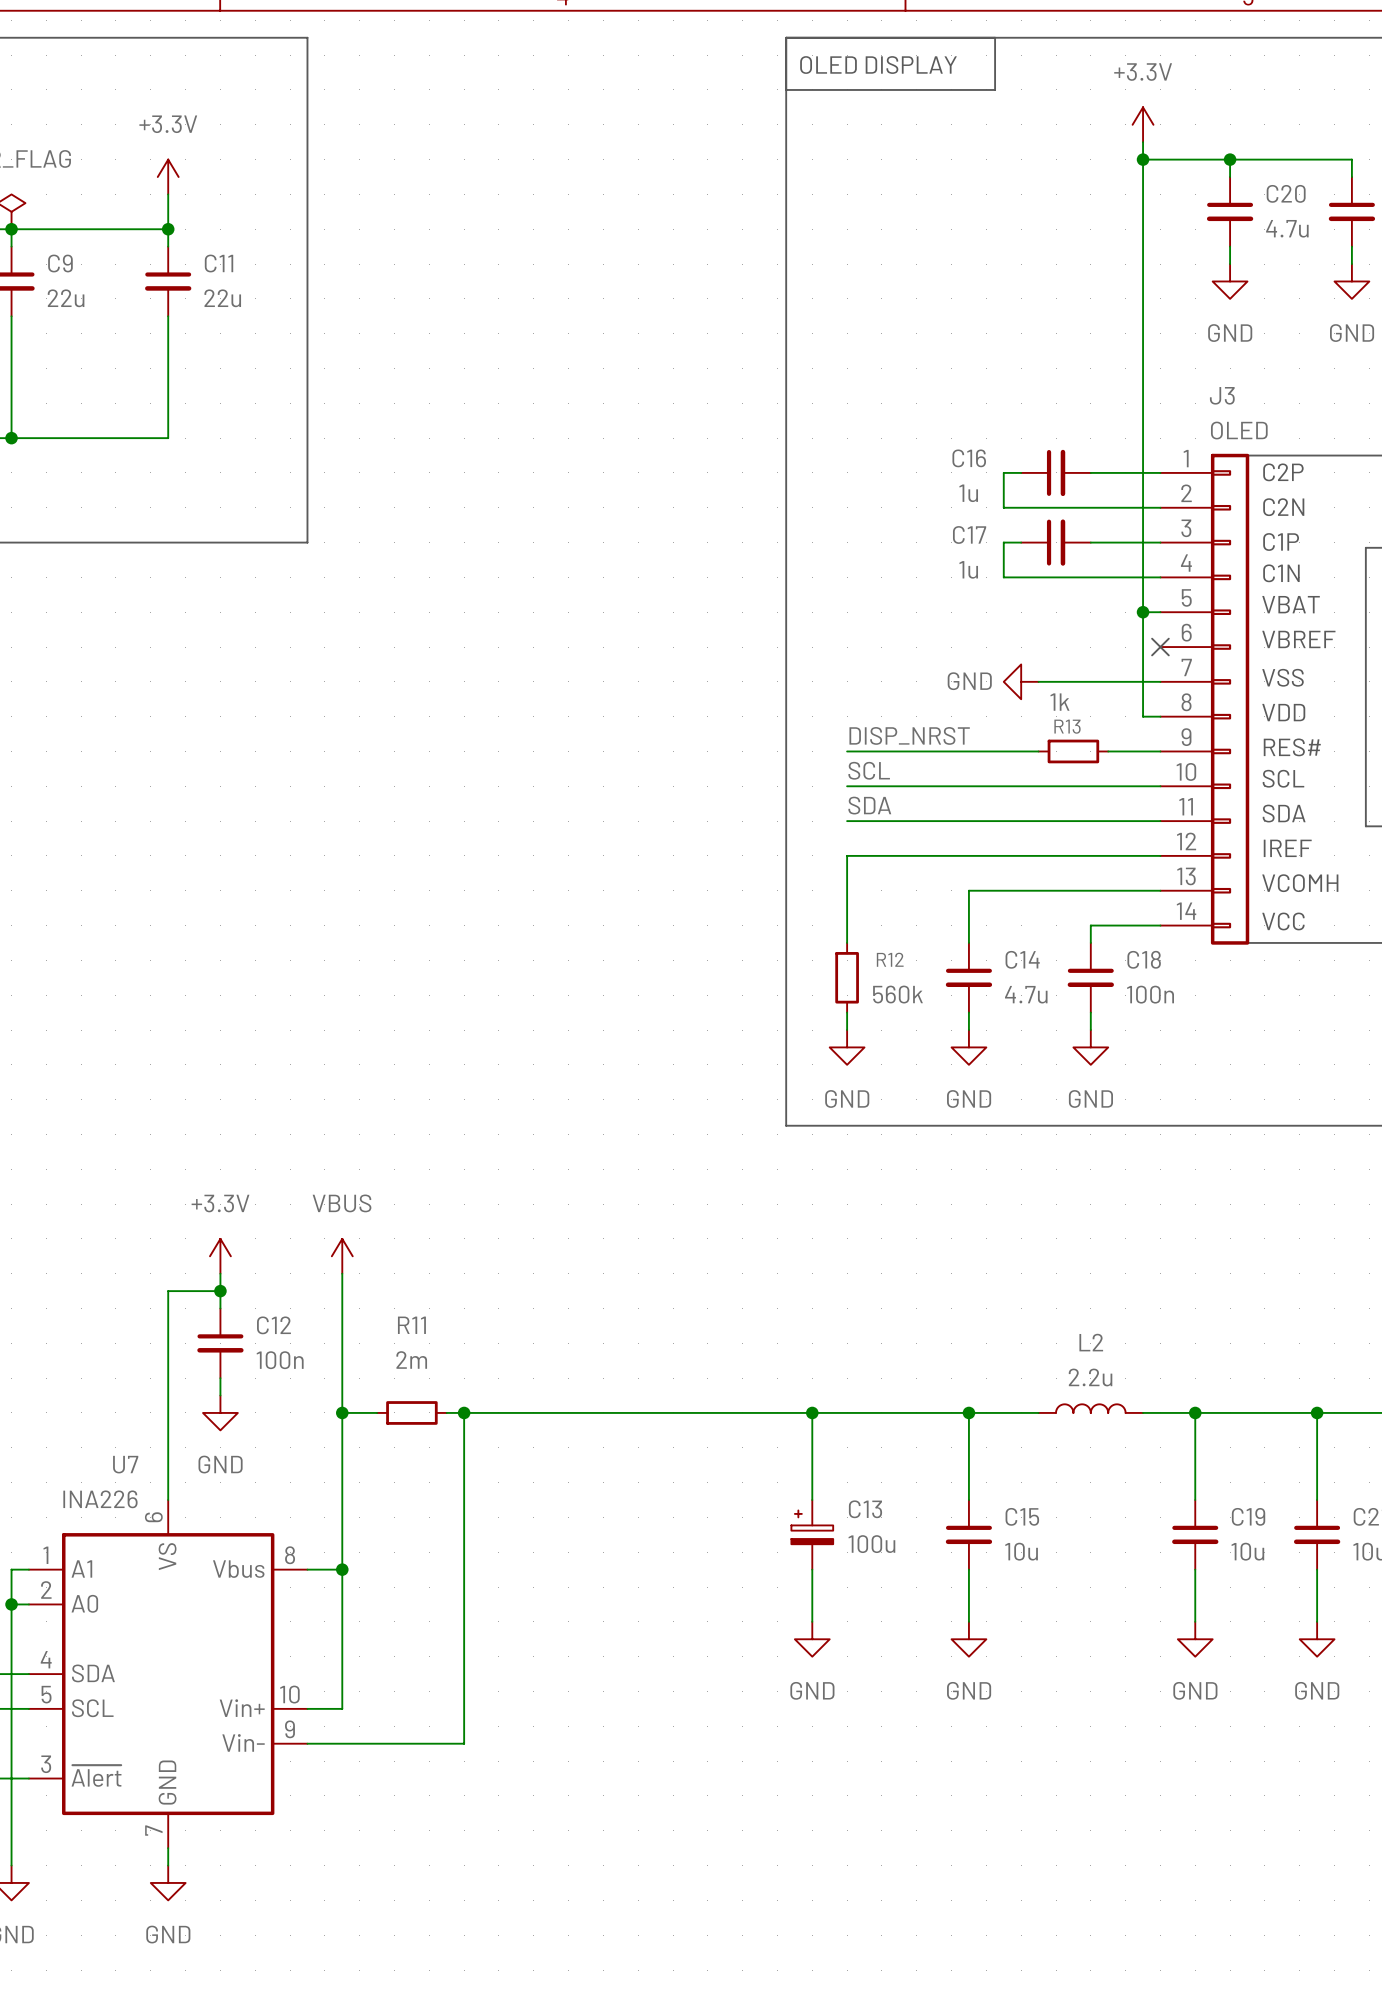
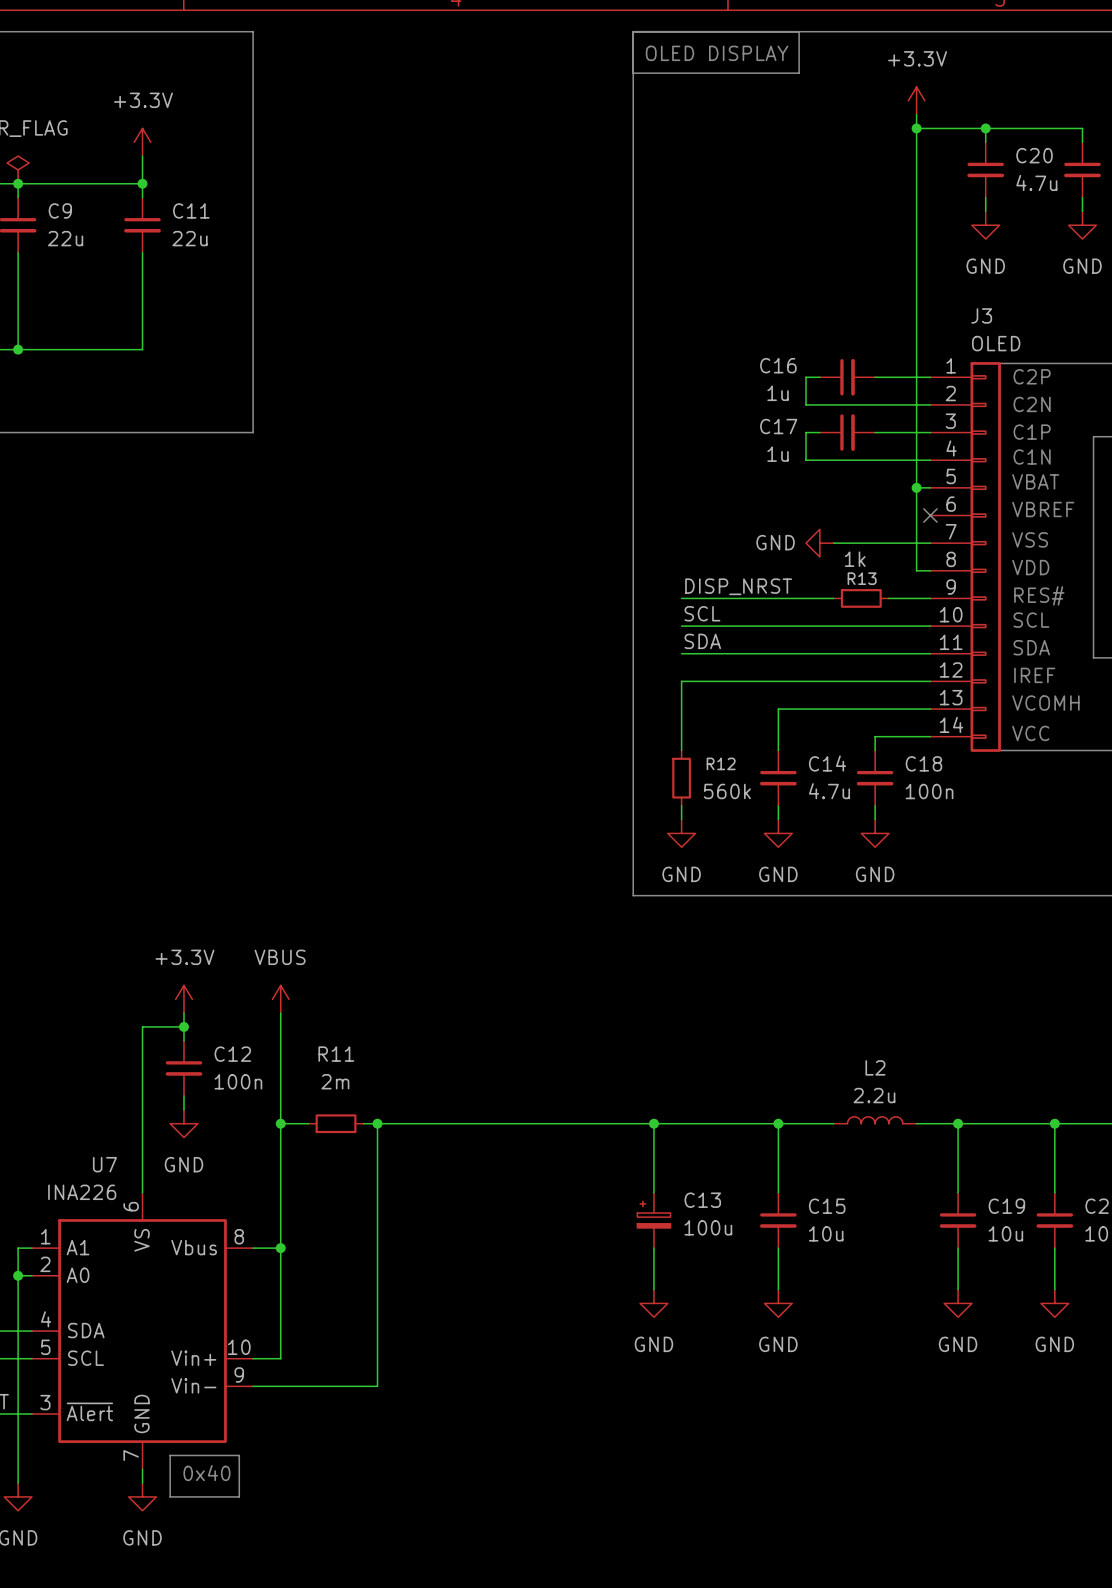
line: none -> (170, 1455) (239, 1455) (239, 1496) (170, 1496) (170, 1455)
text: none -> 0x40 (206, 1473)

